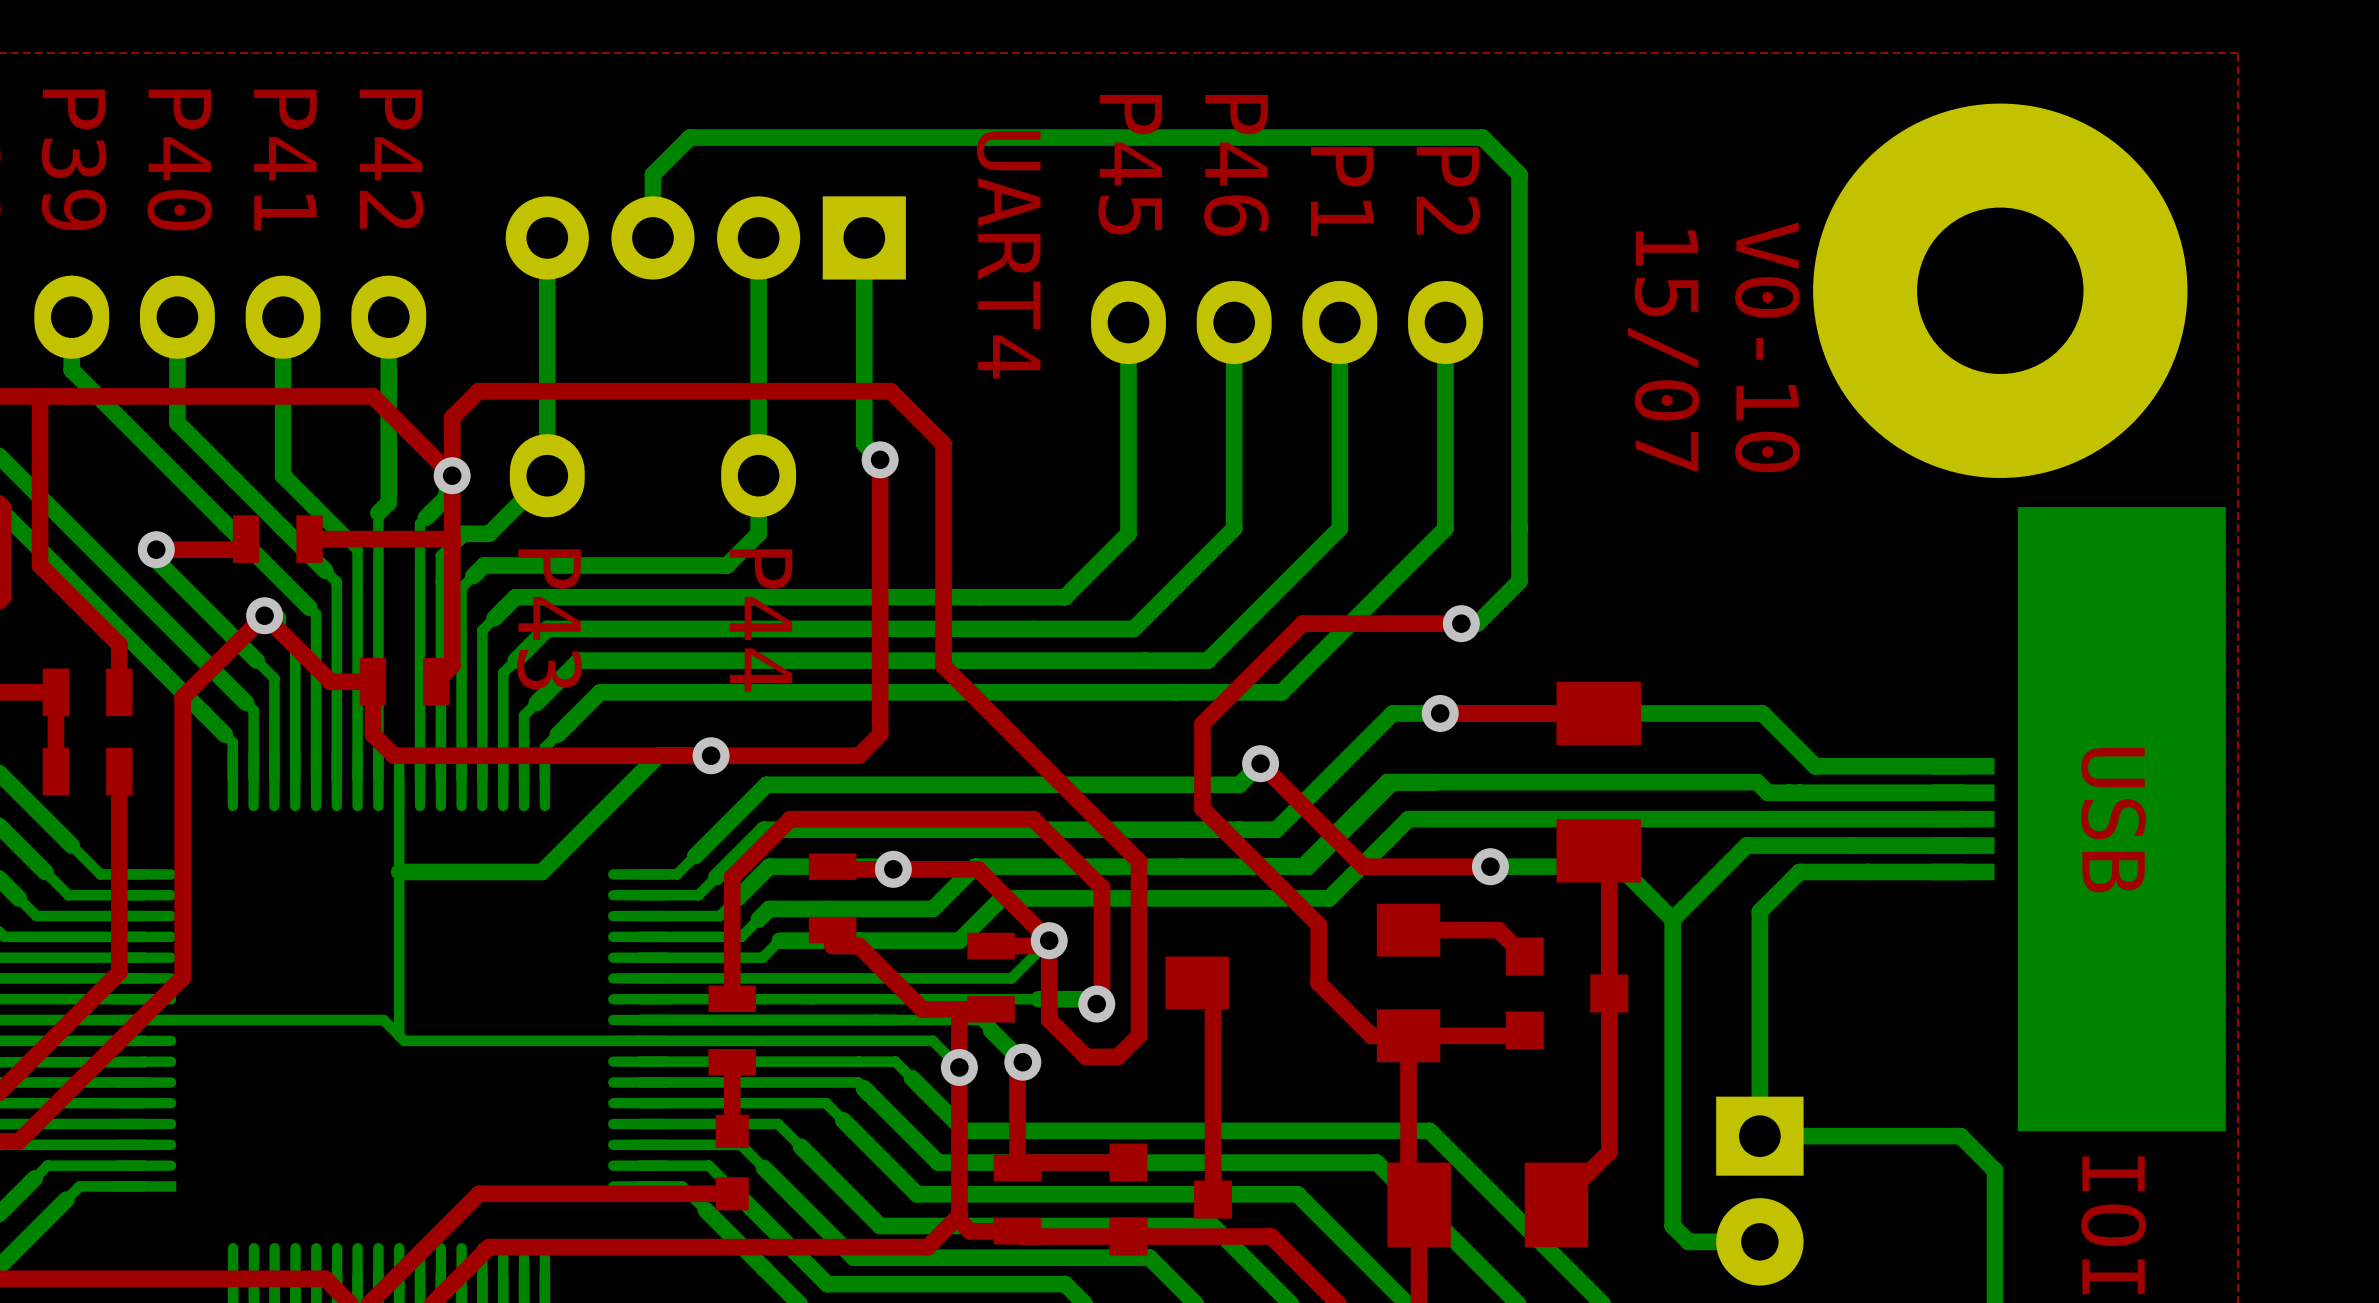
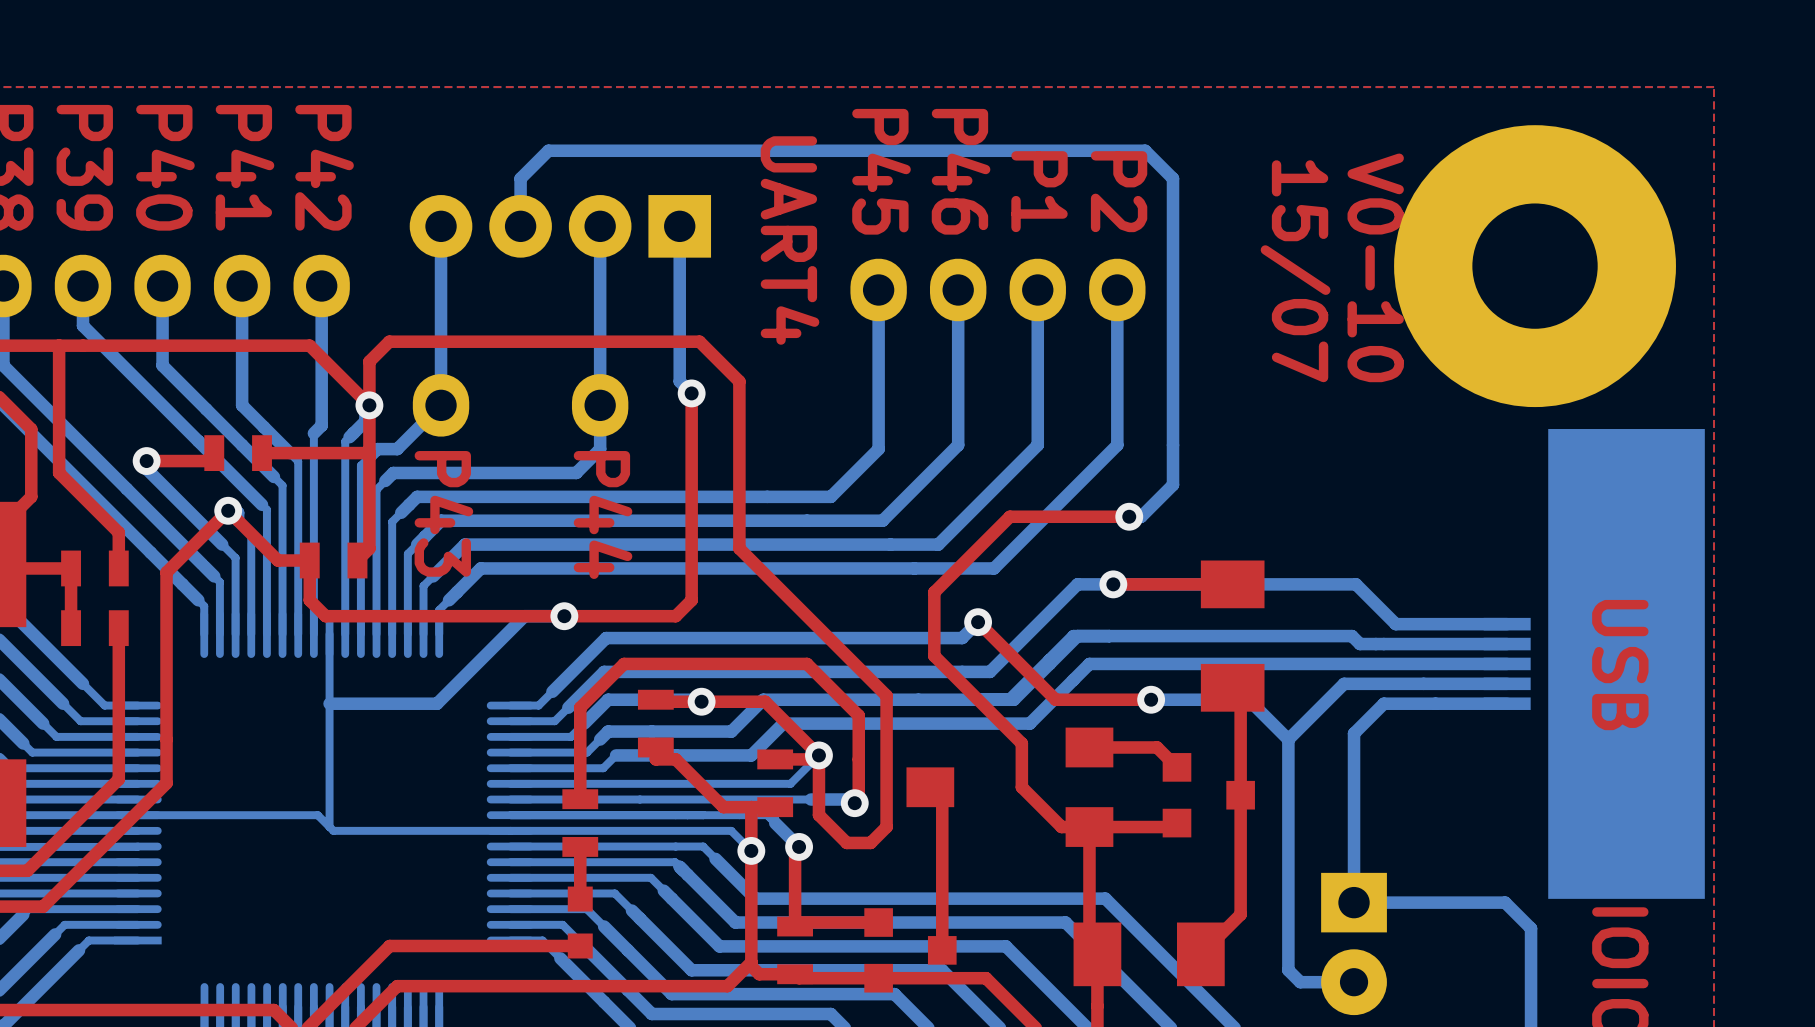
text position: V0-10 (1767, 347) -> V0-10 (1375, 267)
text position: 15/07 (1663, 350) -> 15/07 (1295, 271)

